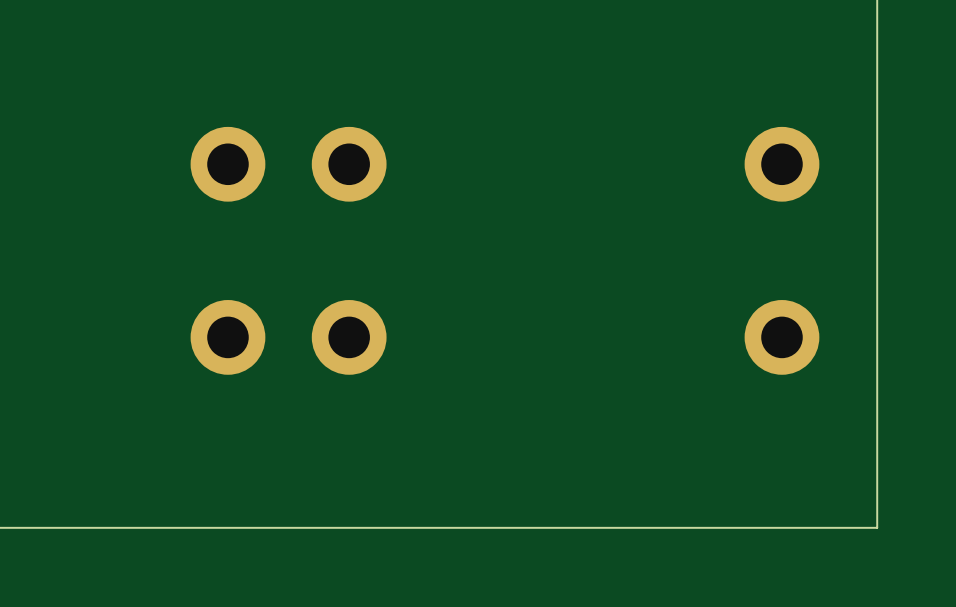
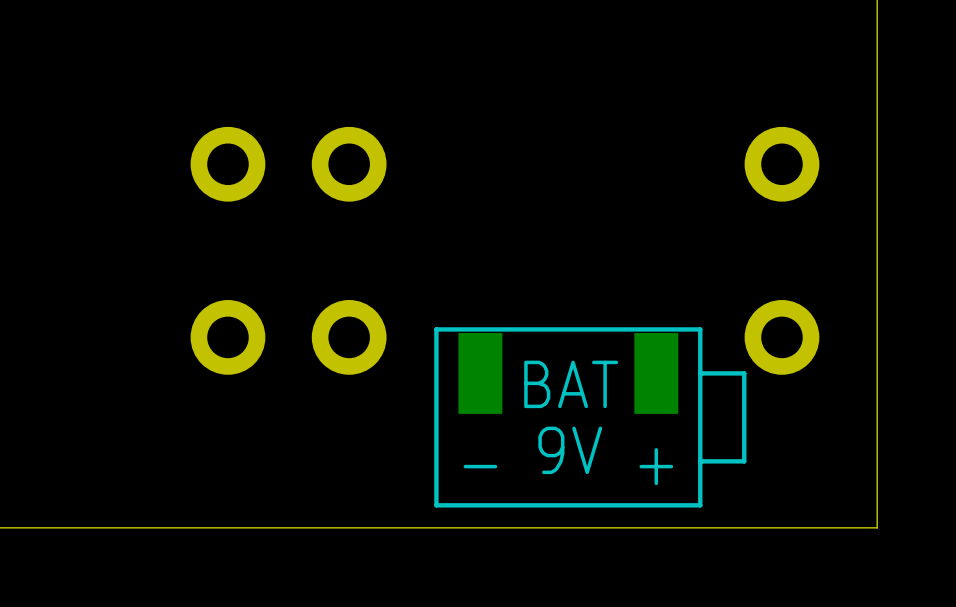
part: none -> (590, 417)

